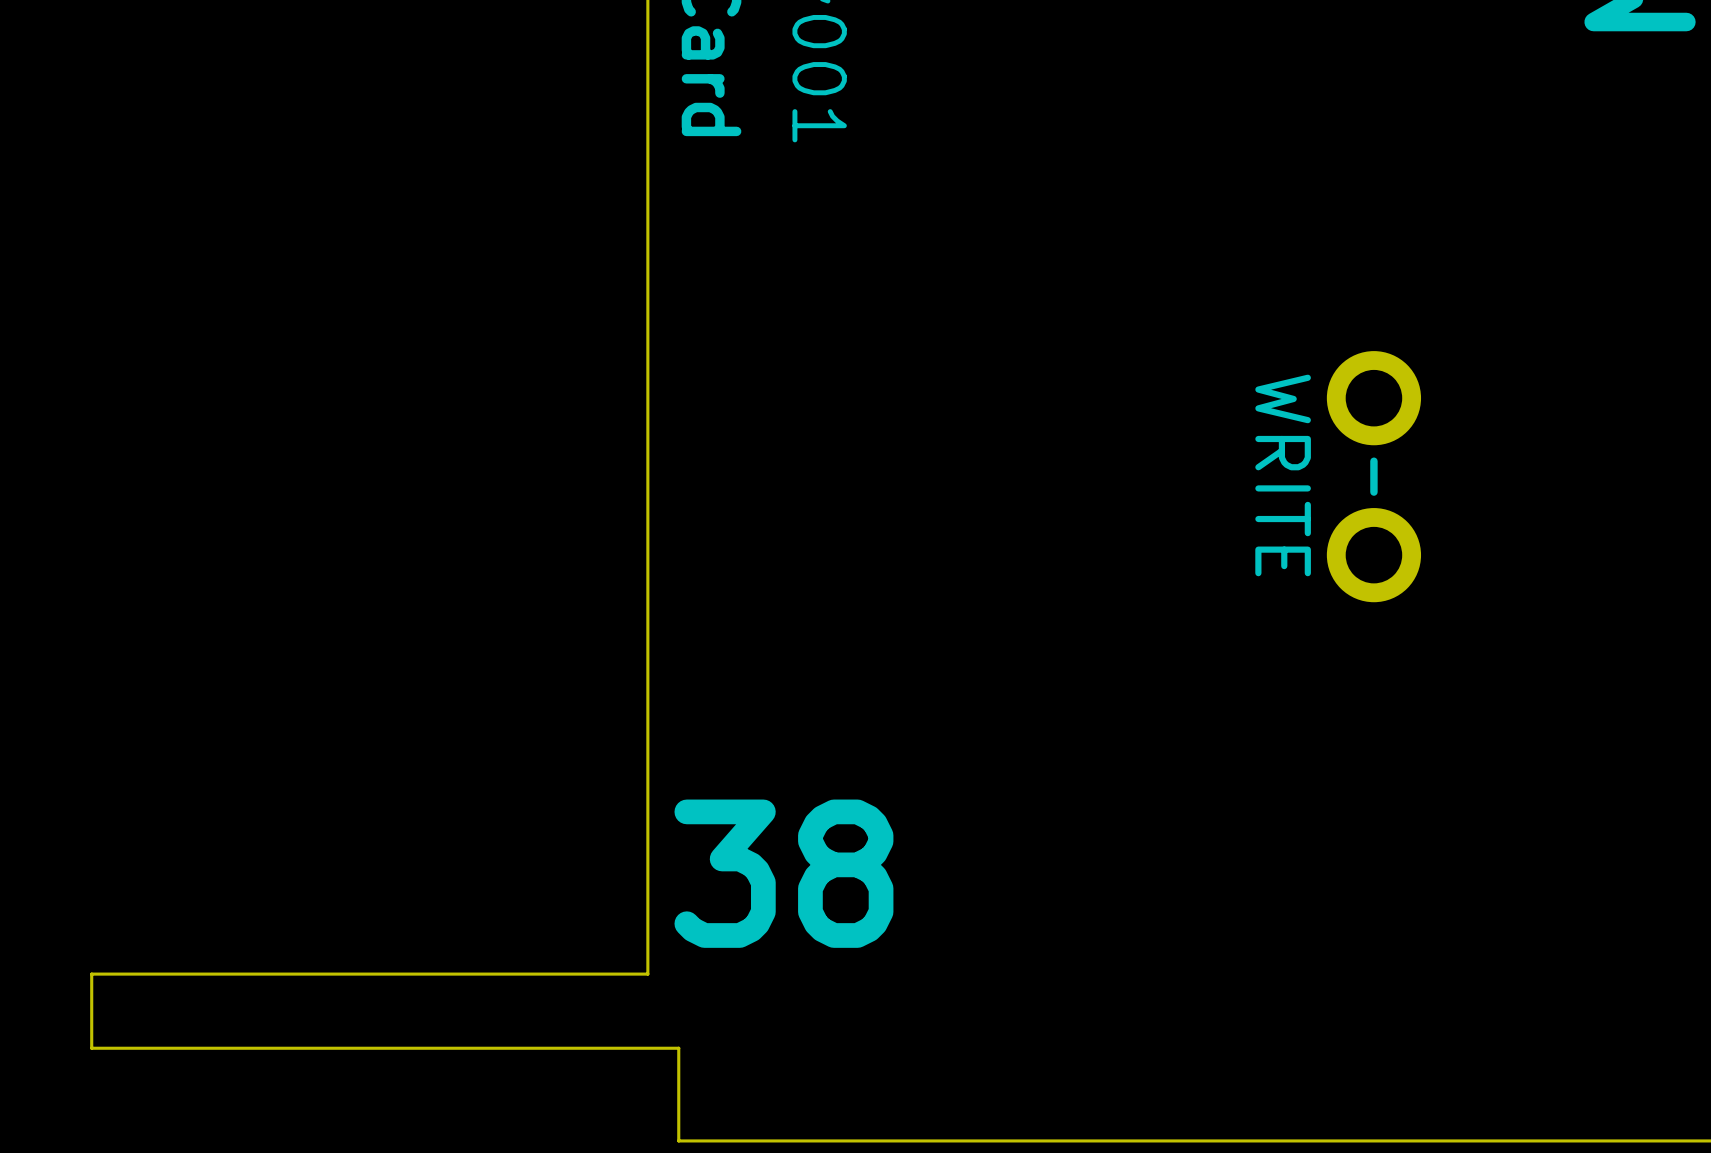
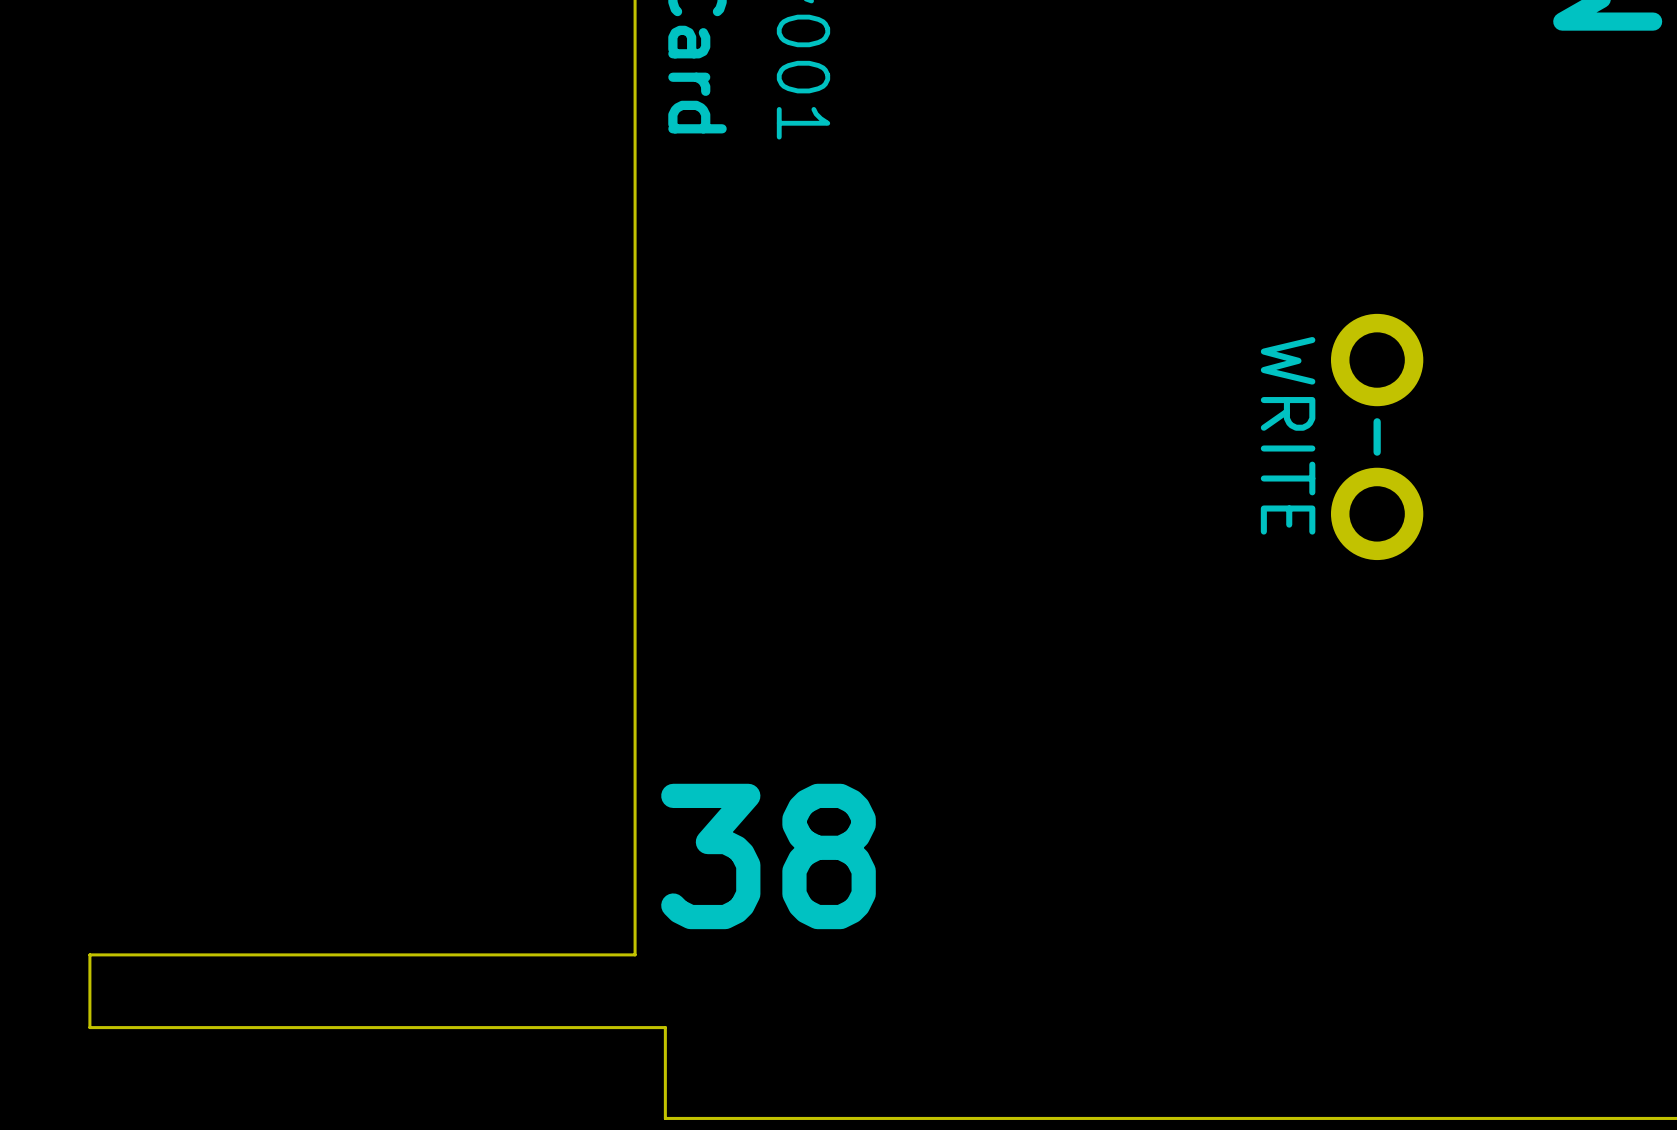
line: (1373, 461) (1373, 492) -> (1377, 421) (1377, 452)
text position: WRITE (1283, 475) -> WRITE (1288, 435)
part position: (1373, 476) -> (1377, 436)

